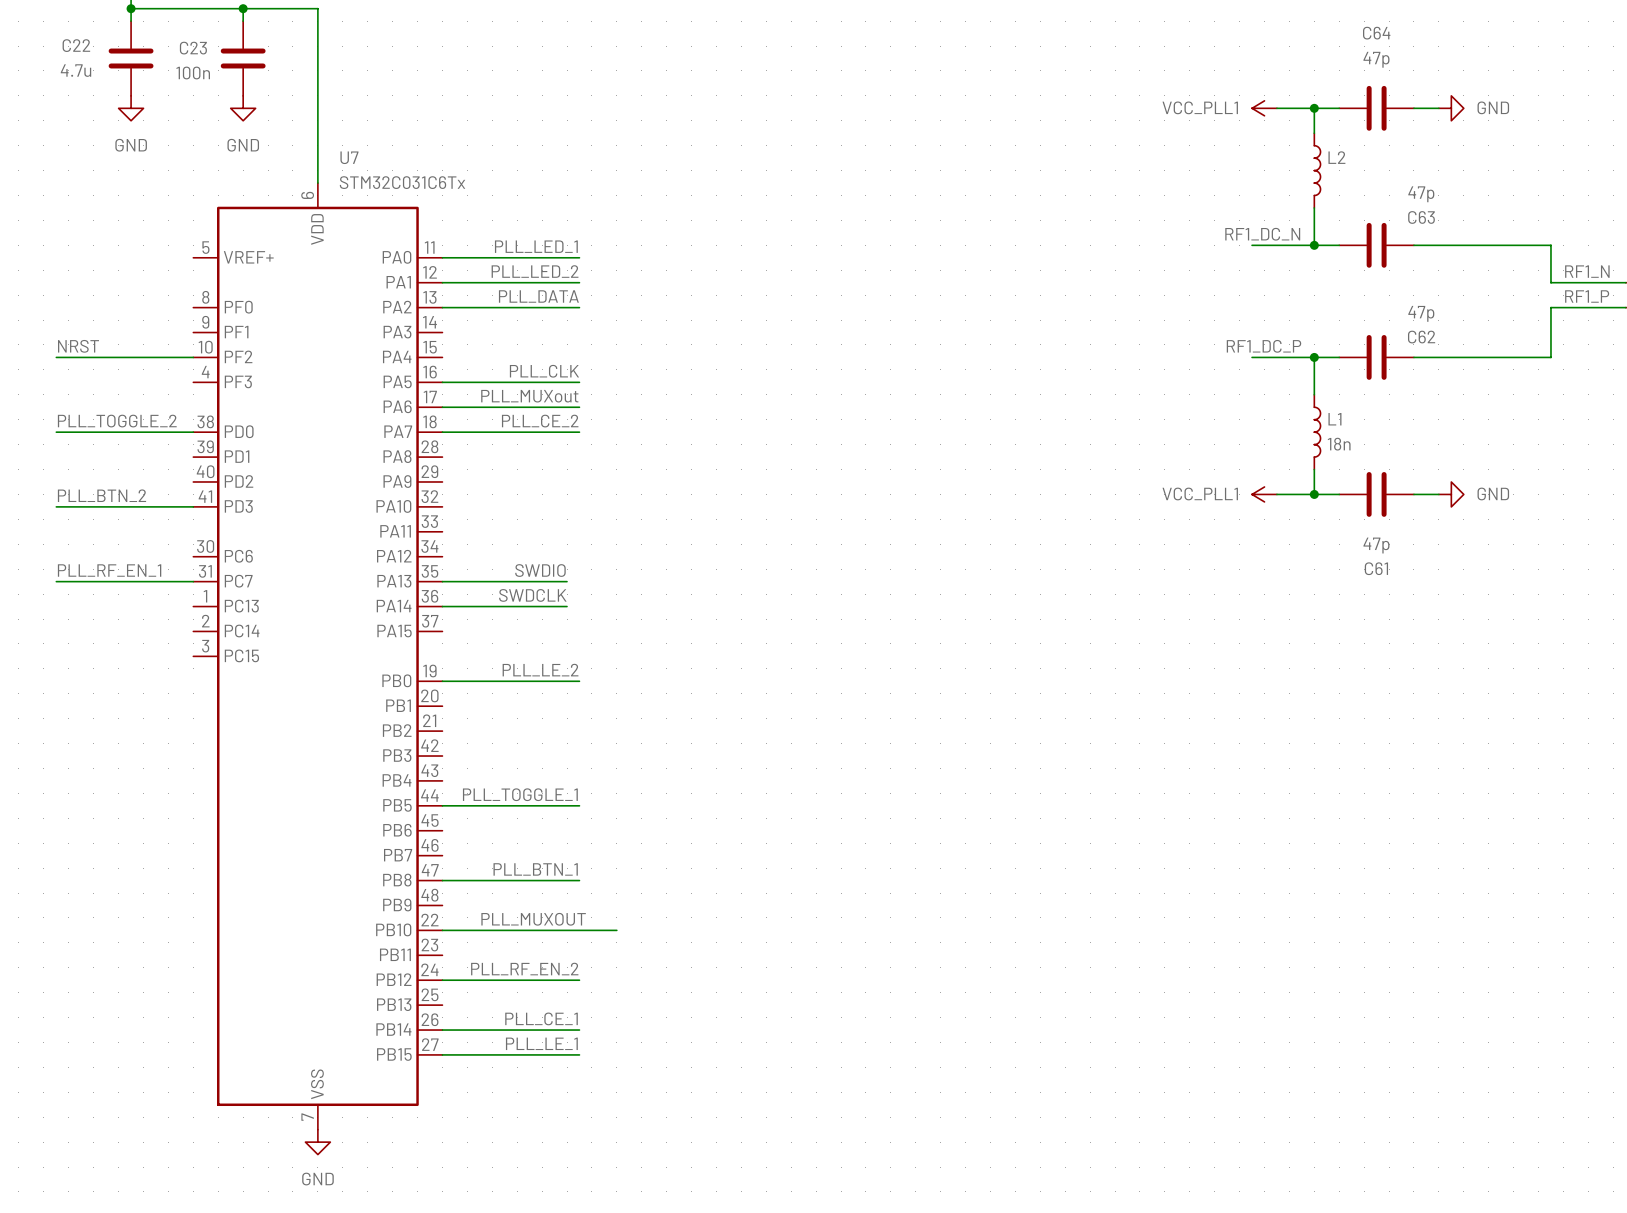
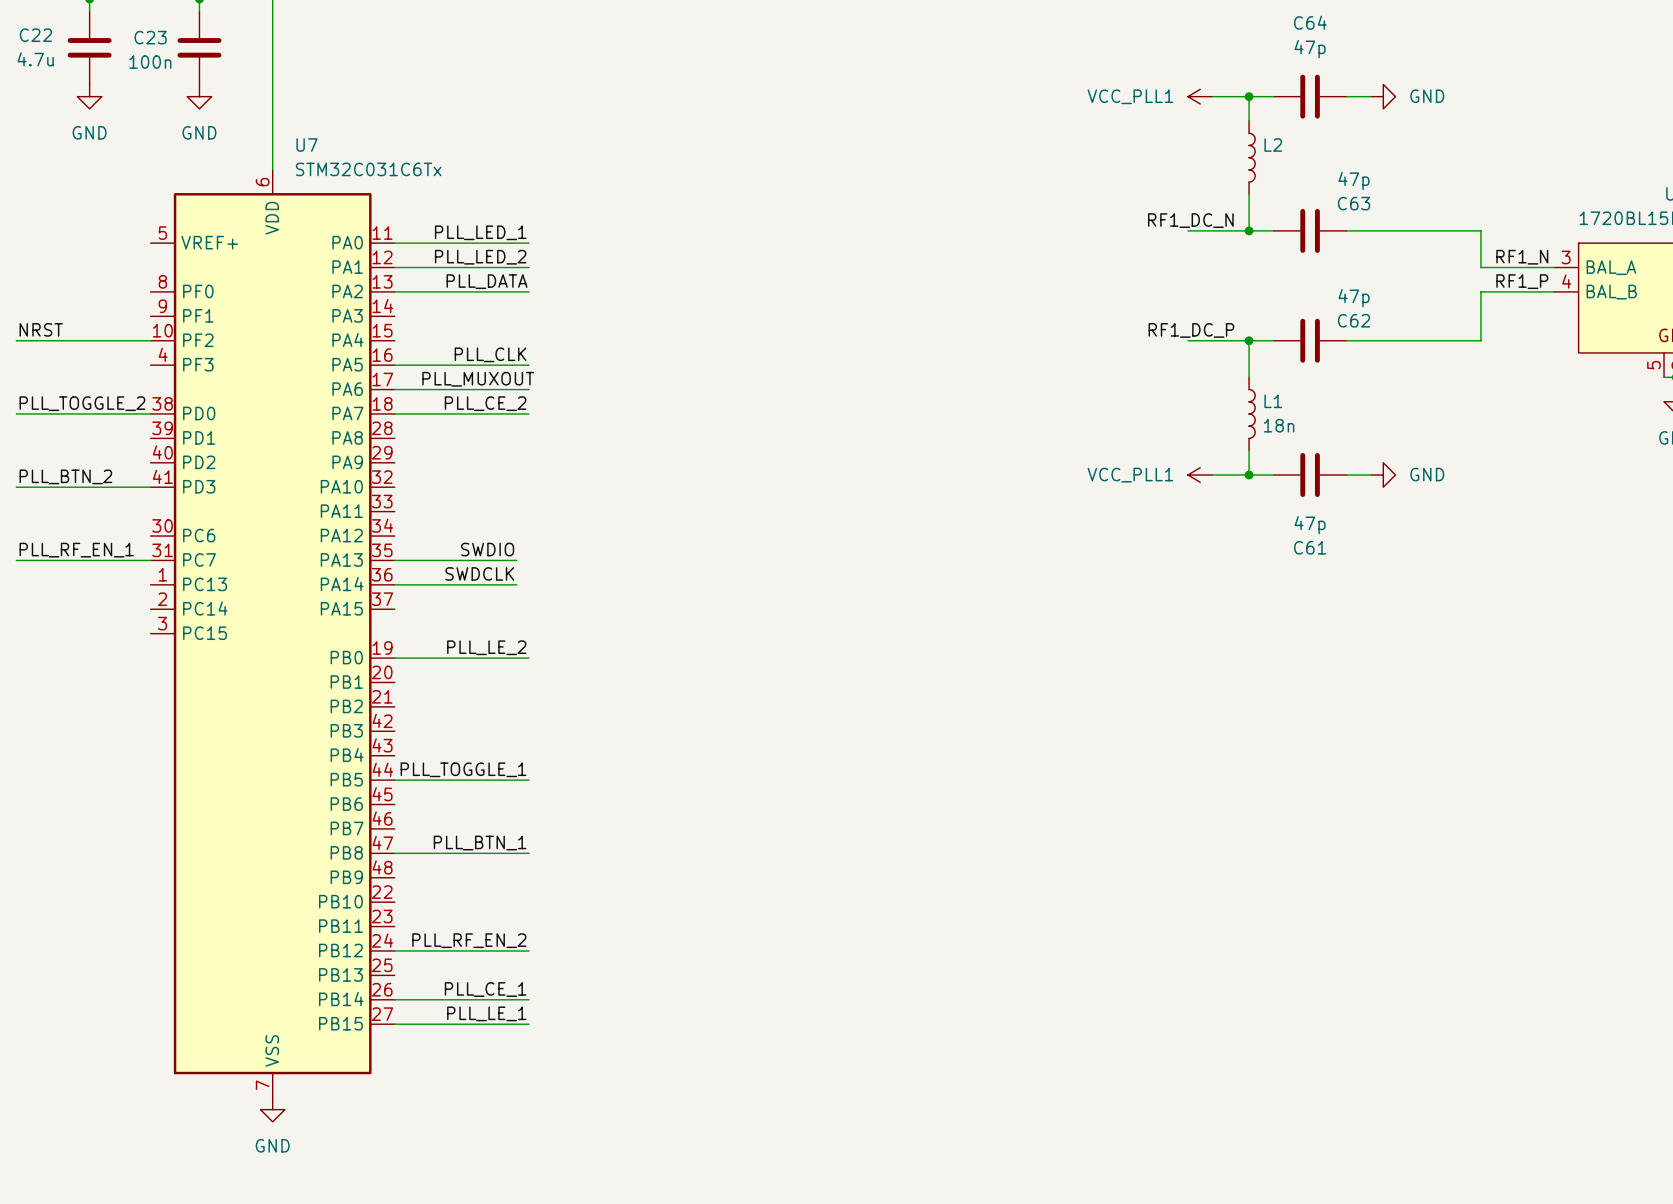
label: PLL_MUXout (529, 396) -> PLL_MUXOUT (478, 379)
label: PLL_MUXOUT (533, 919) -> none
wire: (442, 930) (616, 930) -> none

